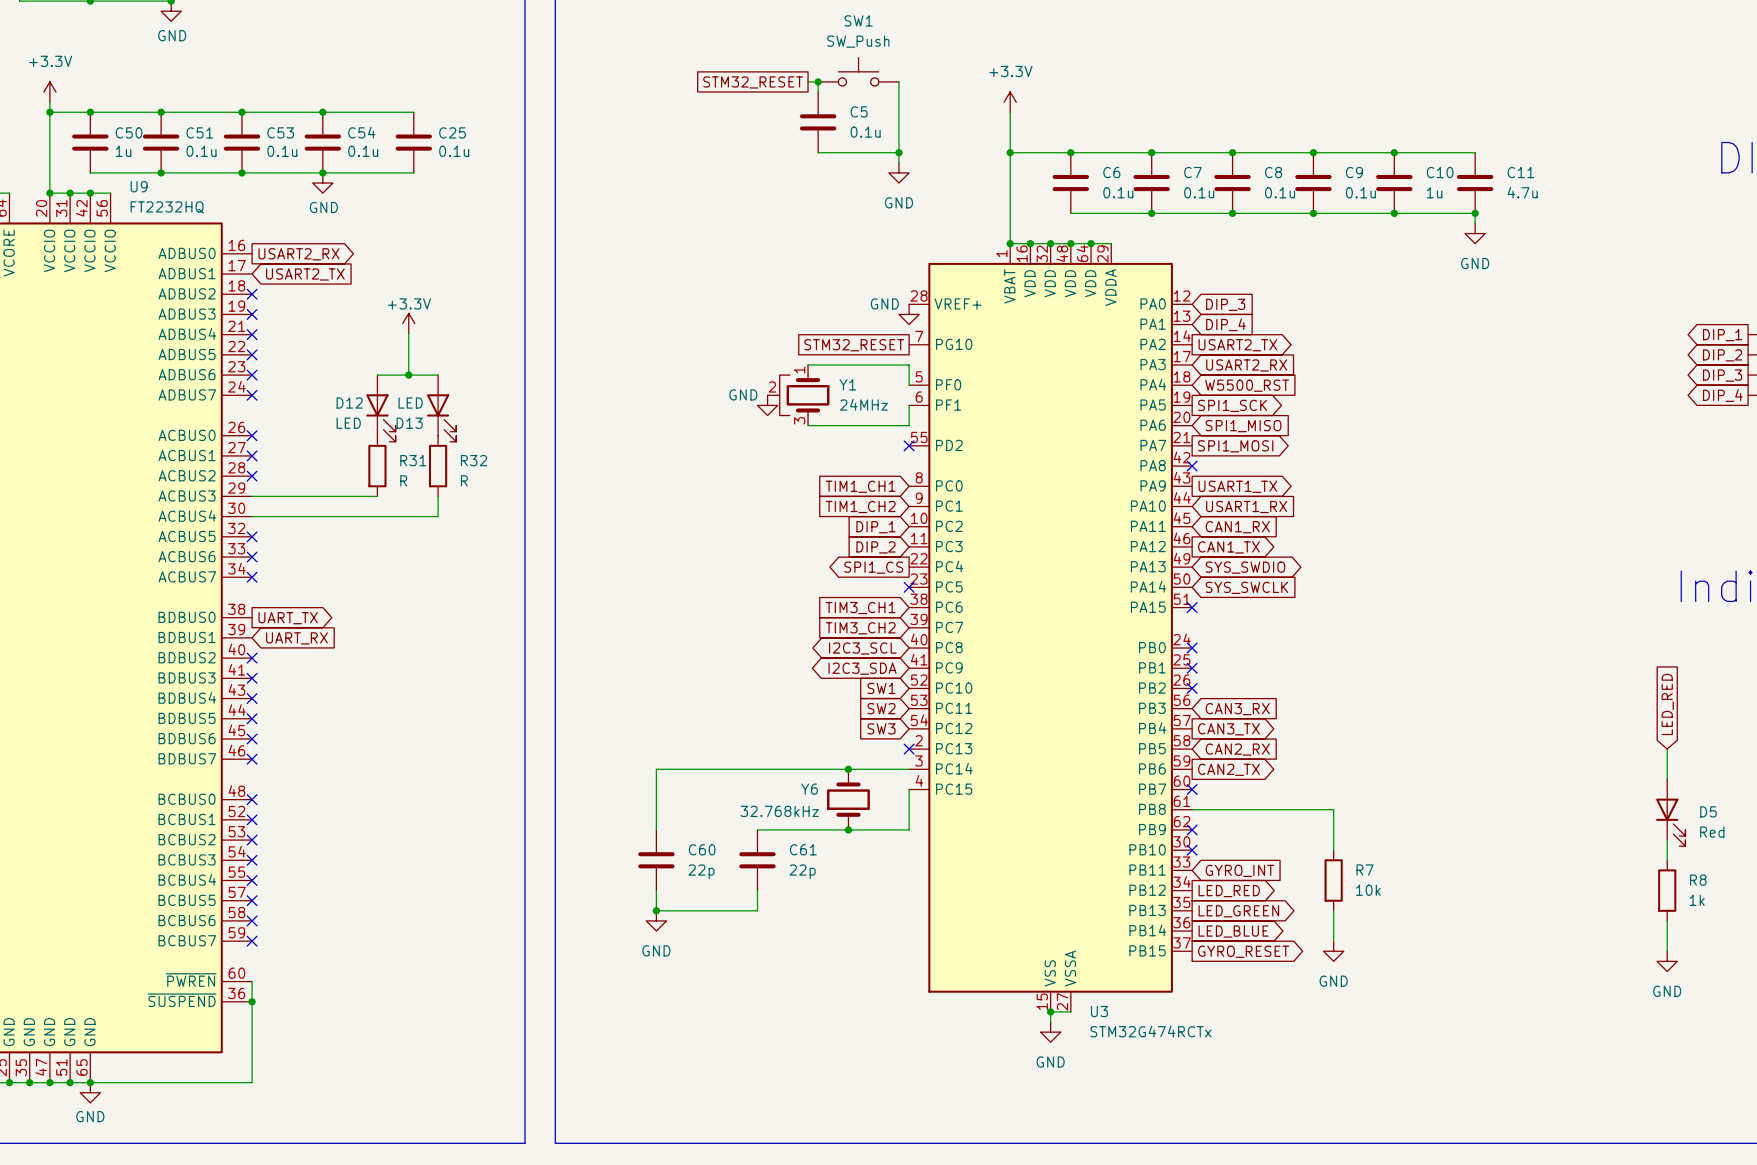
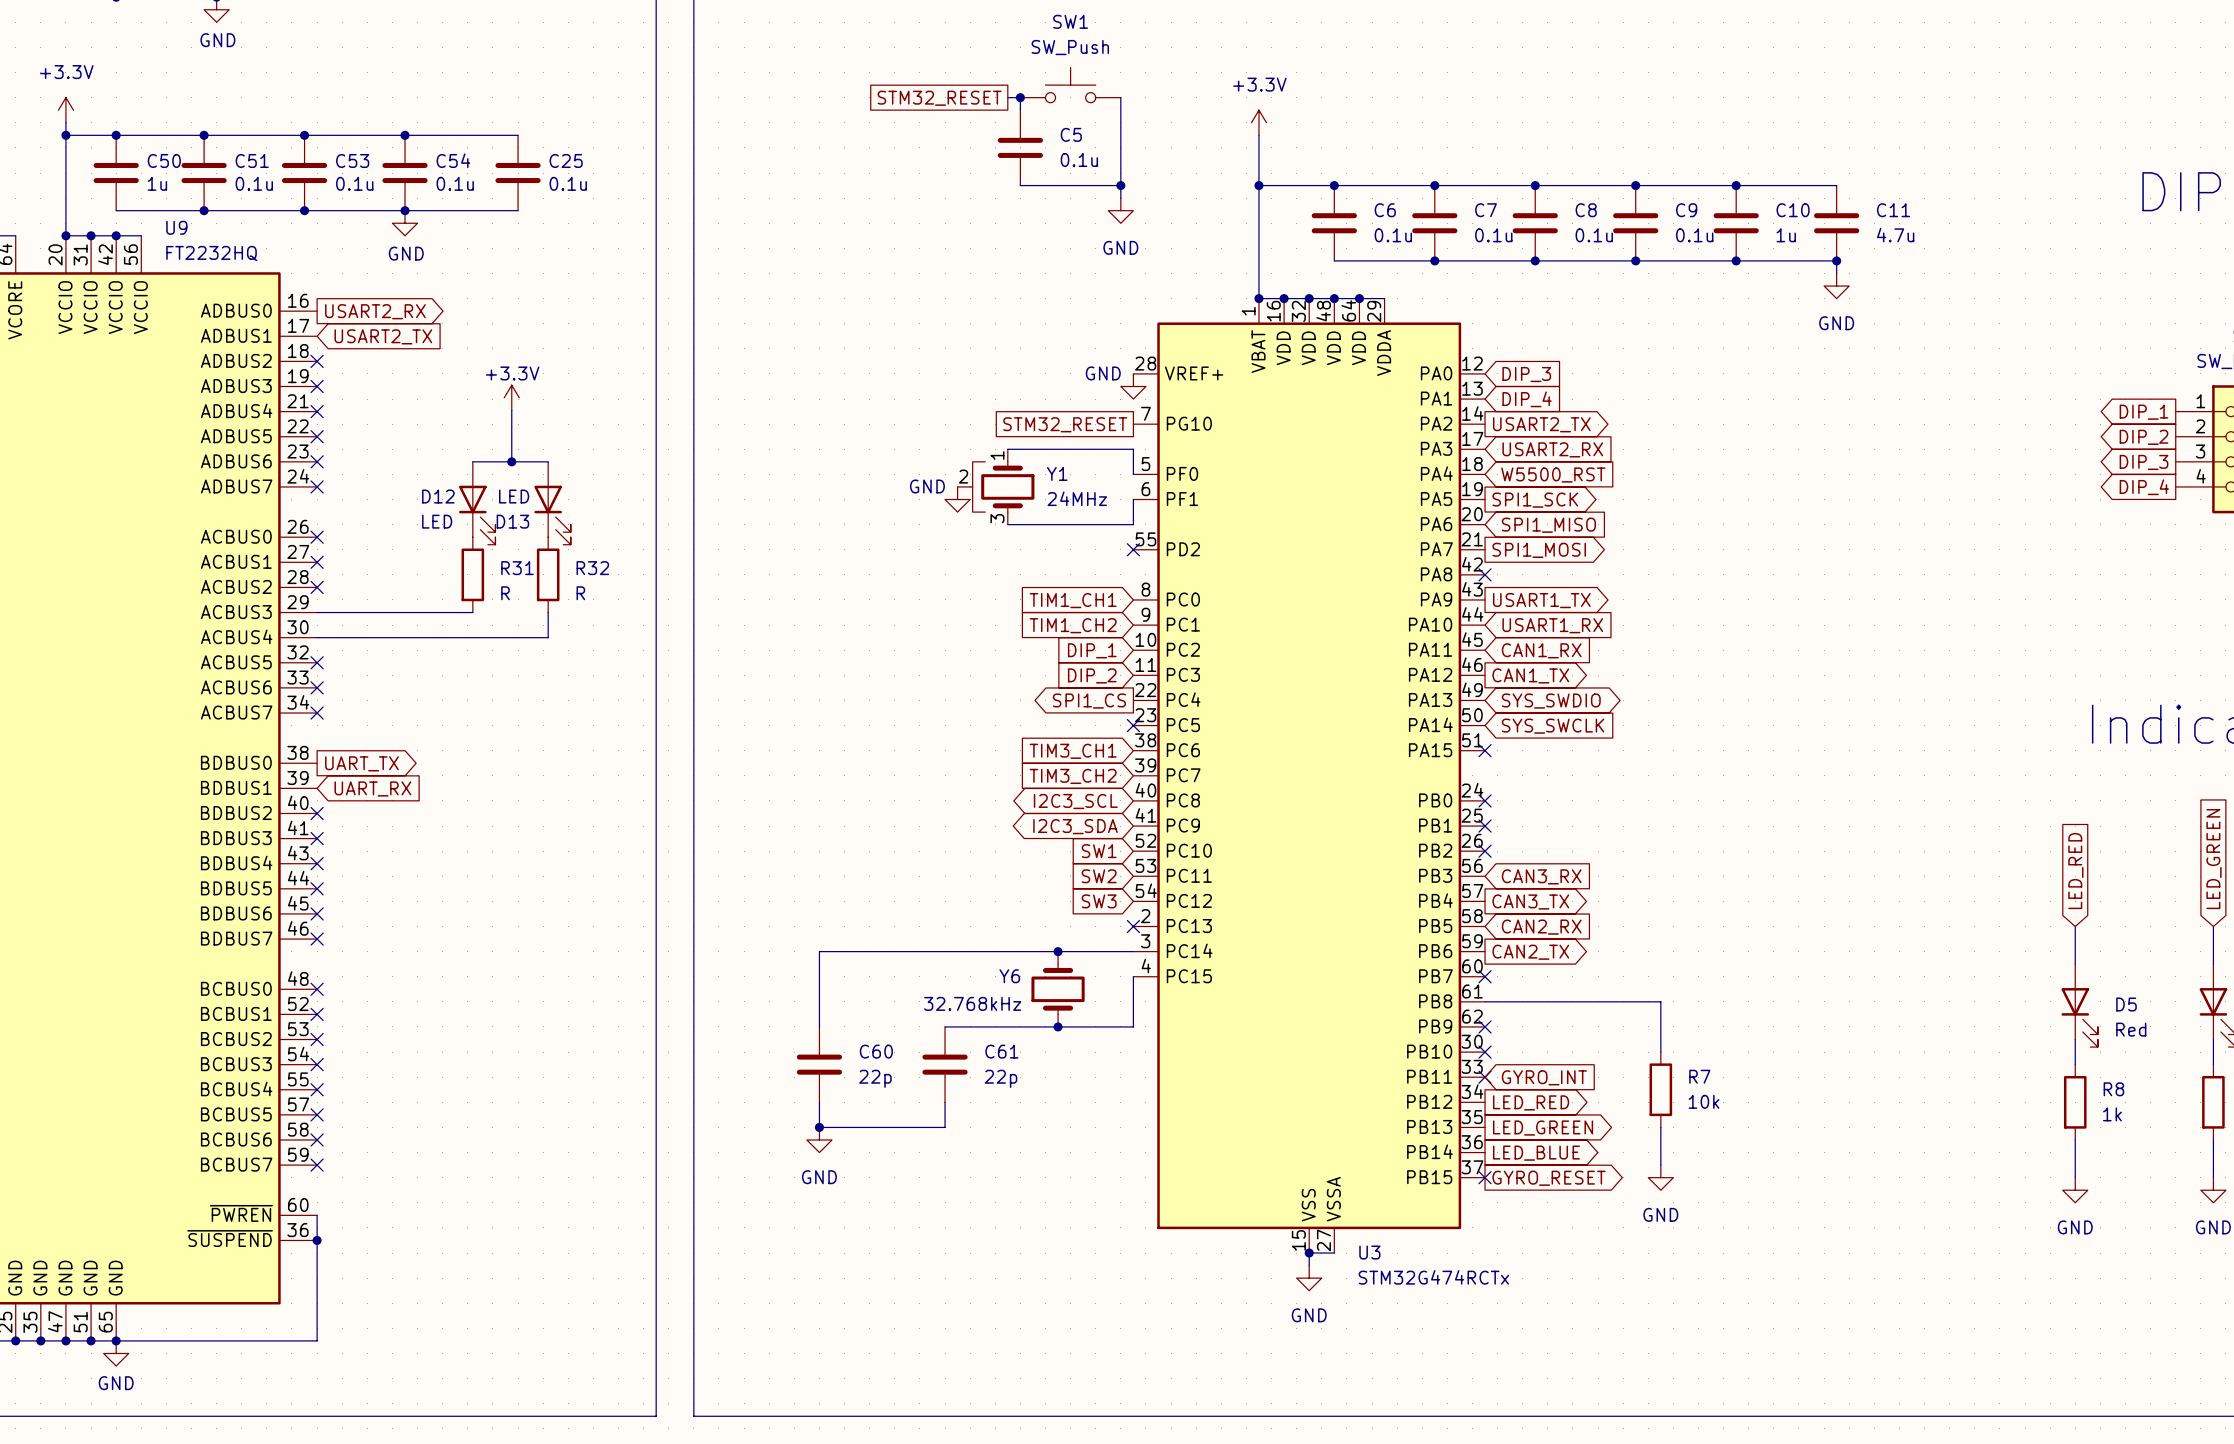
no-connect mark: none -> (1485, 1077)
no-connect mark: none -> (1485, 1177)

